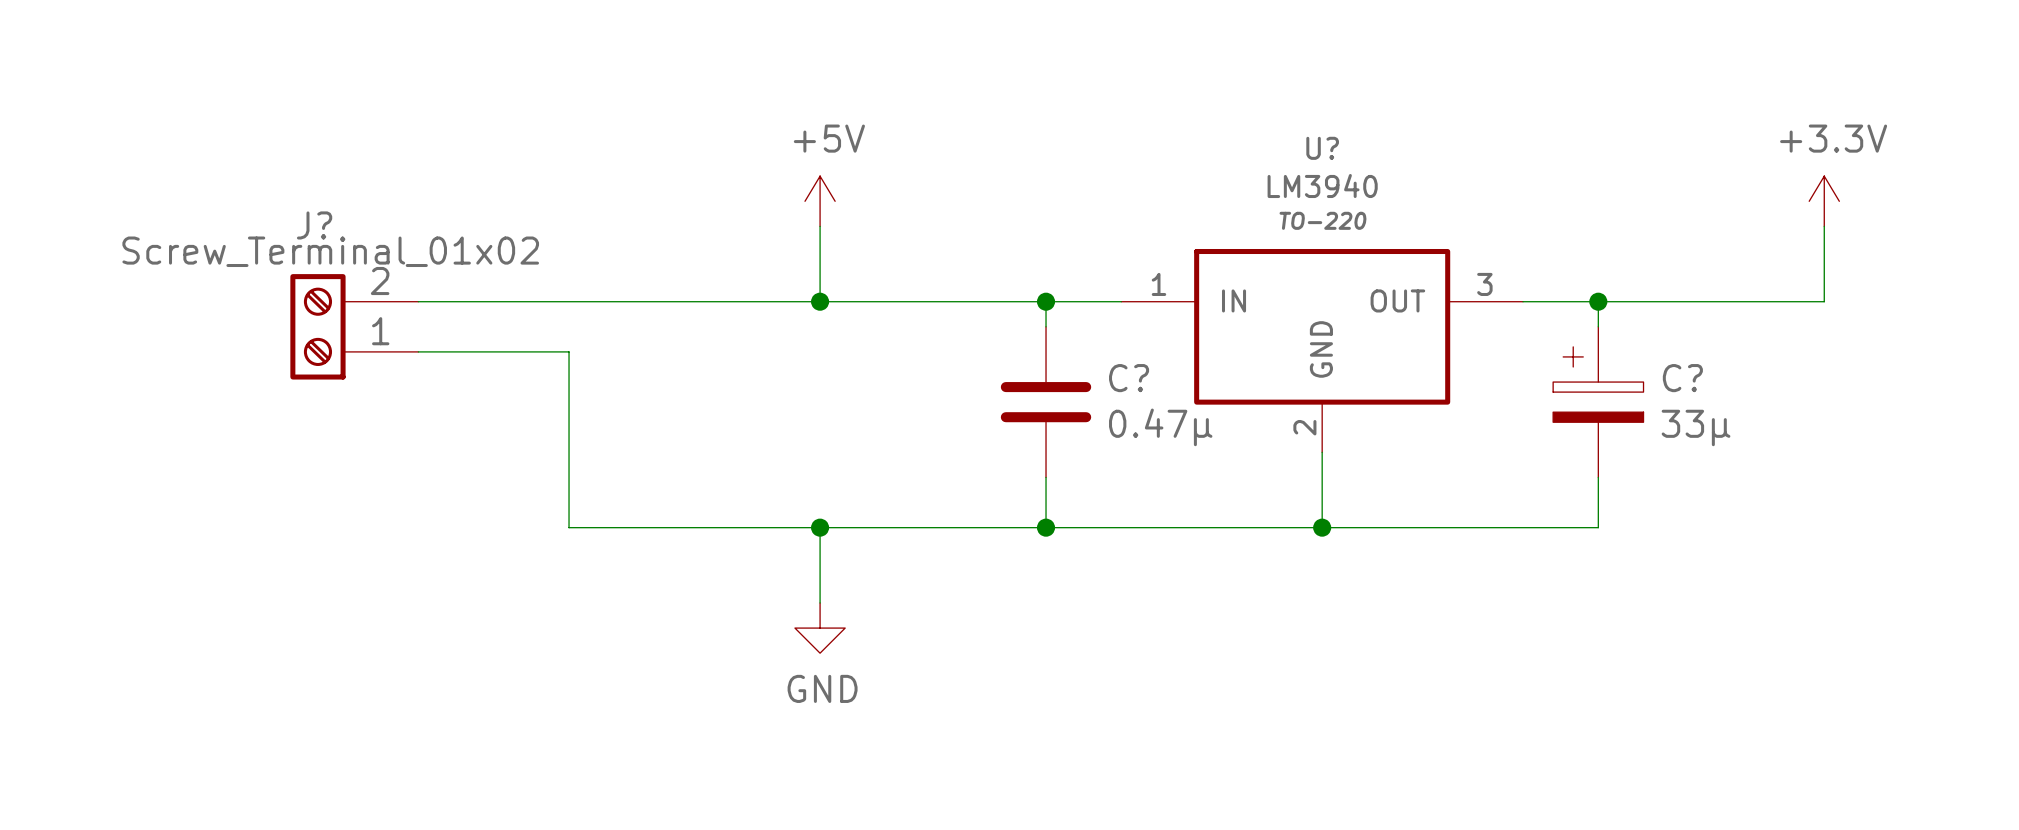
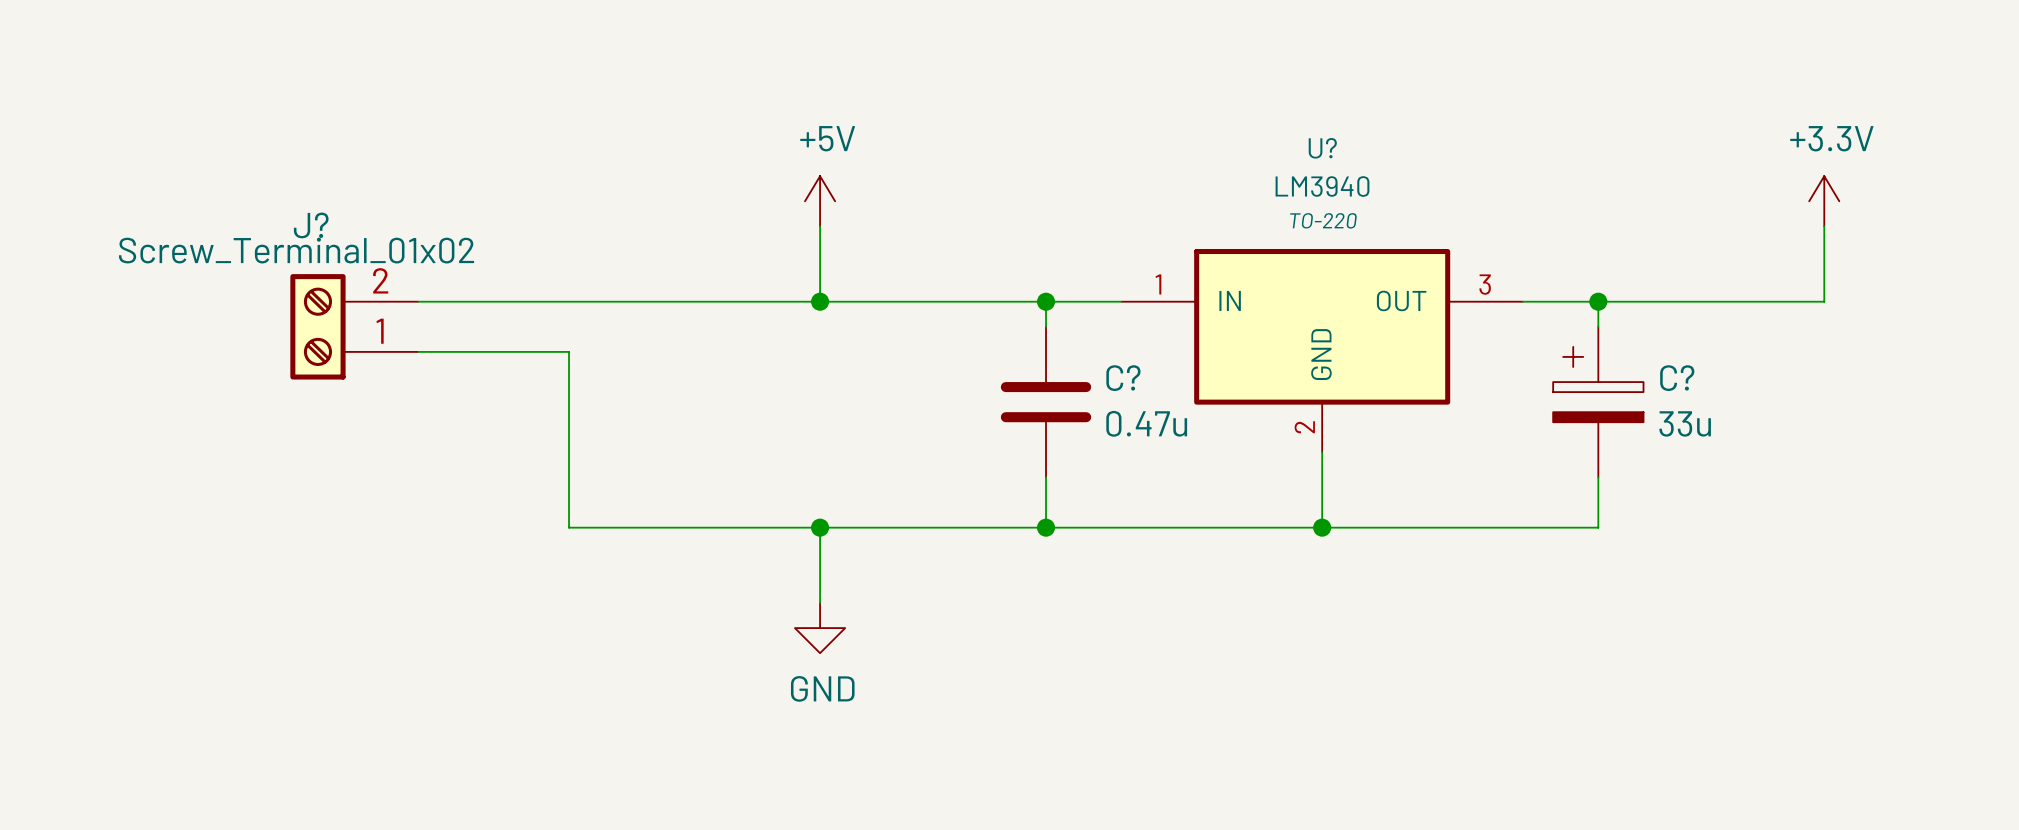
C? value: 0.47µ (1160, 427) -> 0.47u (1146, 423)
C? value: 33µ (1696, 427) -> 33u (1685, 423)

